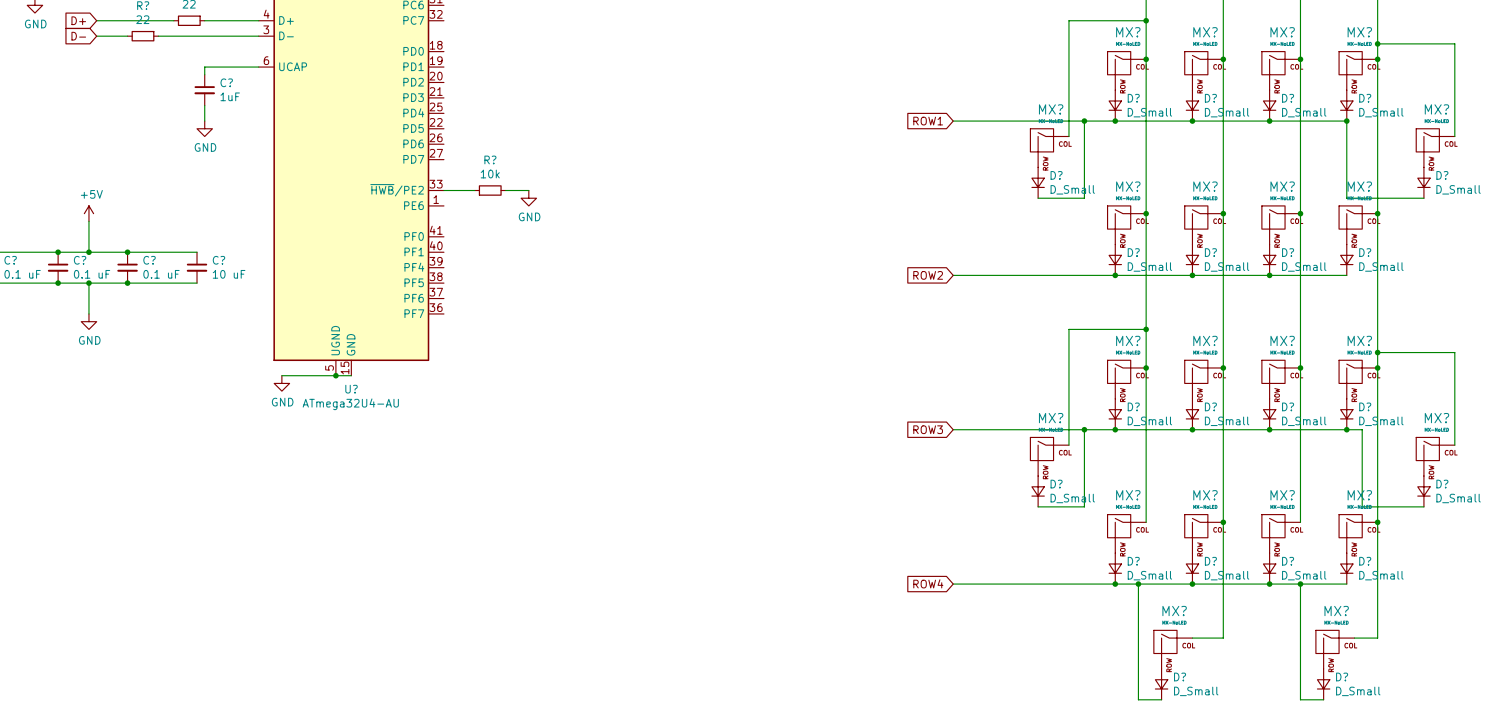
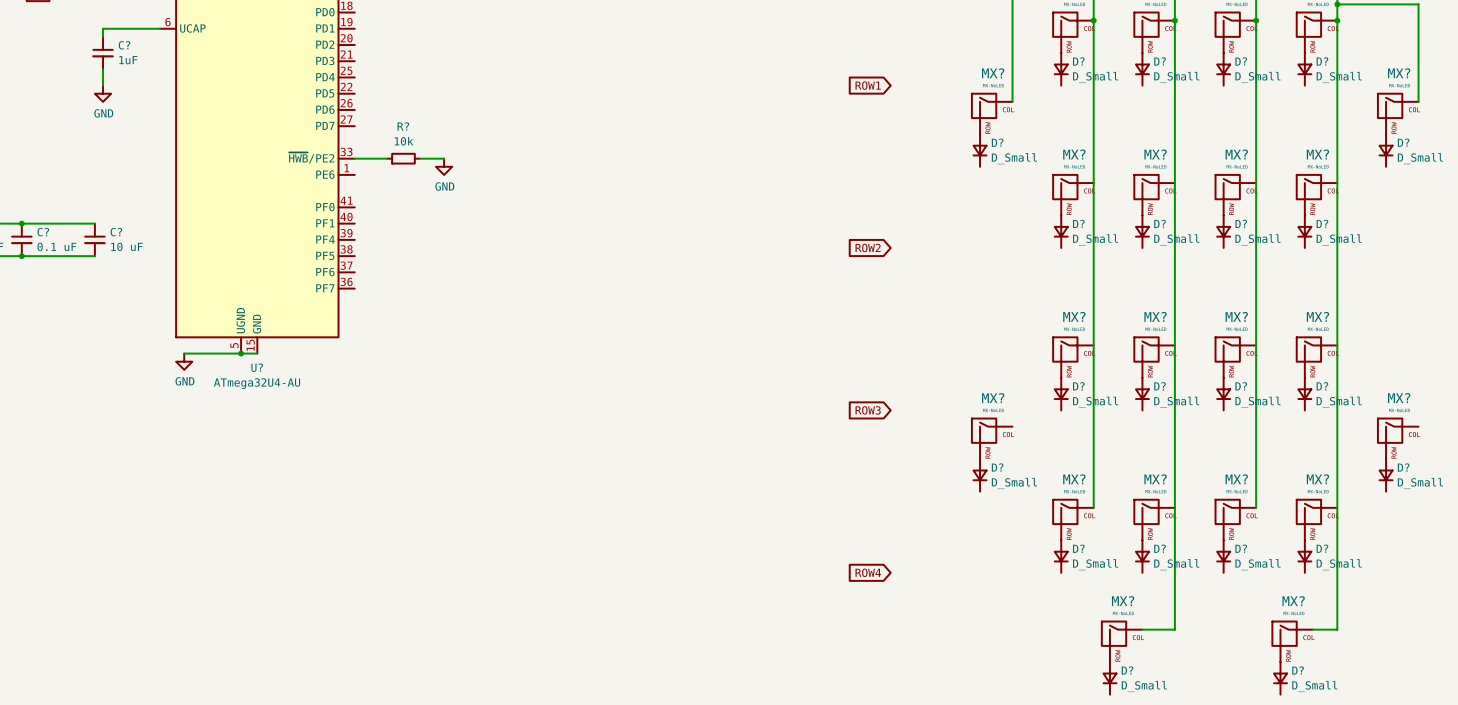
wire: (953, 121) (1346, 121) (1346, 198) (1423, 198) -> none
wire: (1084, 121) (1084, 198) (1038, 198) -> none
junction: (1084, 121) -> none
junction: (1115, 121) -> none
junction: (1192, 121) -> none
junction: (1269, 121) -> none
junction: (1346, 121) -> none
junction: (1146, 213) -> none
junction: (1223, 213) -> none
junction: (1300, 213) -> none
junction: (1377, 213) -> none
wire: (953, 275) (1346, 275) -> none
junction: (1115, 275) -> none
junction: (1192, 275) -> none
junction: (1269, 275) -> none
wire: (1146, 329) (1068, 329) (1068, 445) -> none
junction: (1146, 329) -> none
wire: (1377, 352) (1454, 352) (1454, 445) -> none
junction: (1377, 352) -> none
junction: (1146, 367) -> none
junction: (1223, 367) -> none
junction: (1300, 367) -> none
junction: (1377, 367) -> none
wire: (953, 429) (1362, 429) (1362, 506) (1423, 506) -> none
wire: (1084, 429) (1084, 506) (1038, 506) -> none
junction: (1084, 429) -> none
junction: (1115, 429) -> none
junction: (1192, 429) -> none
junction: (1269, 429) -> none
junction: (1346, 429) -> none
junction: (1223, 522) -> none
junction: (1377, 522) -> none
wire: (953, 584) (1346, 584) -> none
junction: (1115, 584) -> none
wire: (1138, 584) (1138, 699) (1161, 699) -> none
junction: (1138, 584) -> none
junction: (1192, 584) -> none
junction: (1269, 584) -> none
wire: (1300, 584) (1300, 699) (1323, 699) -> none
junction: (1300, 584) -> none

